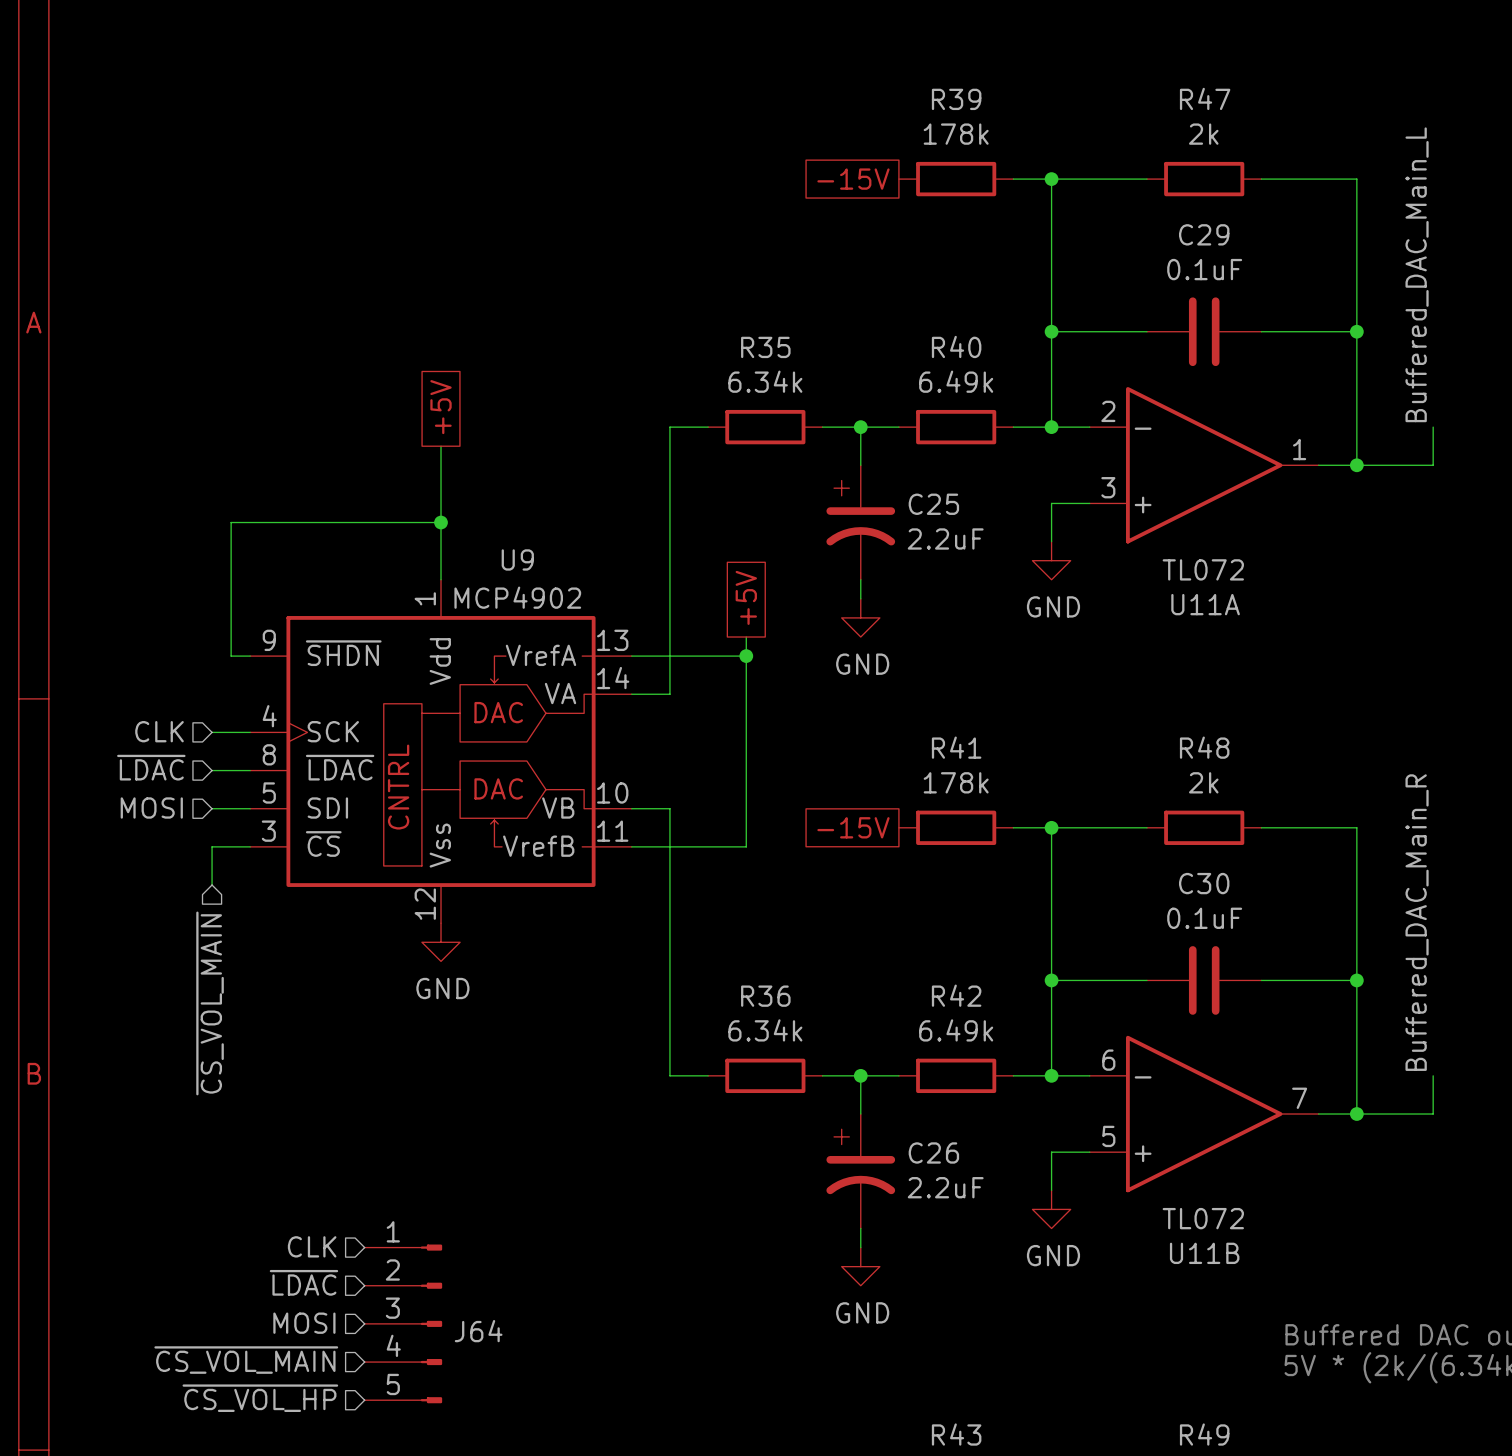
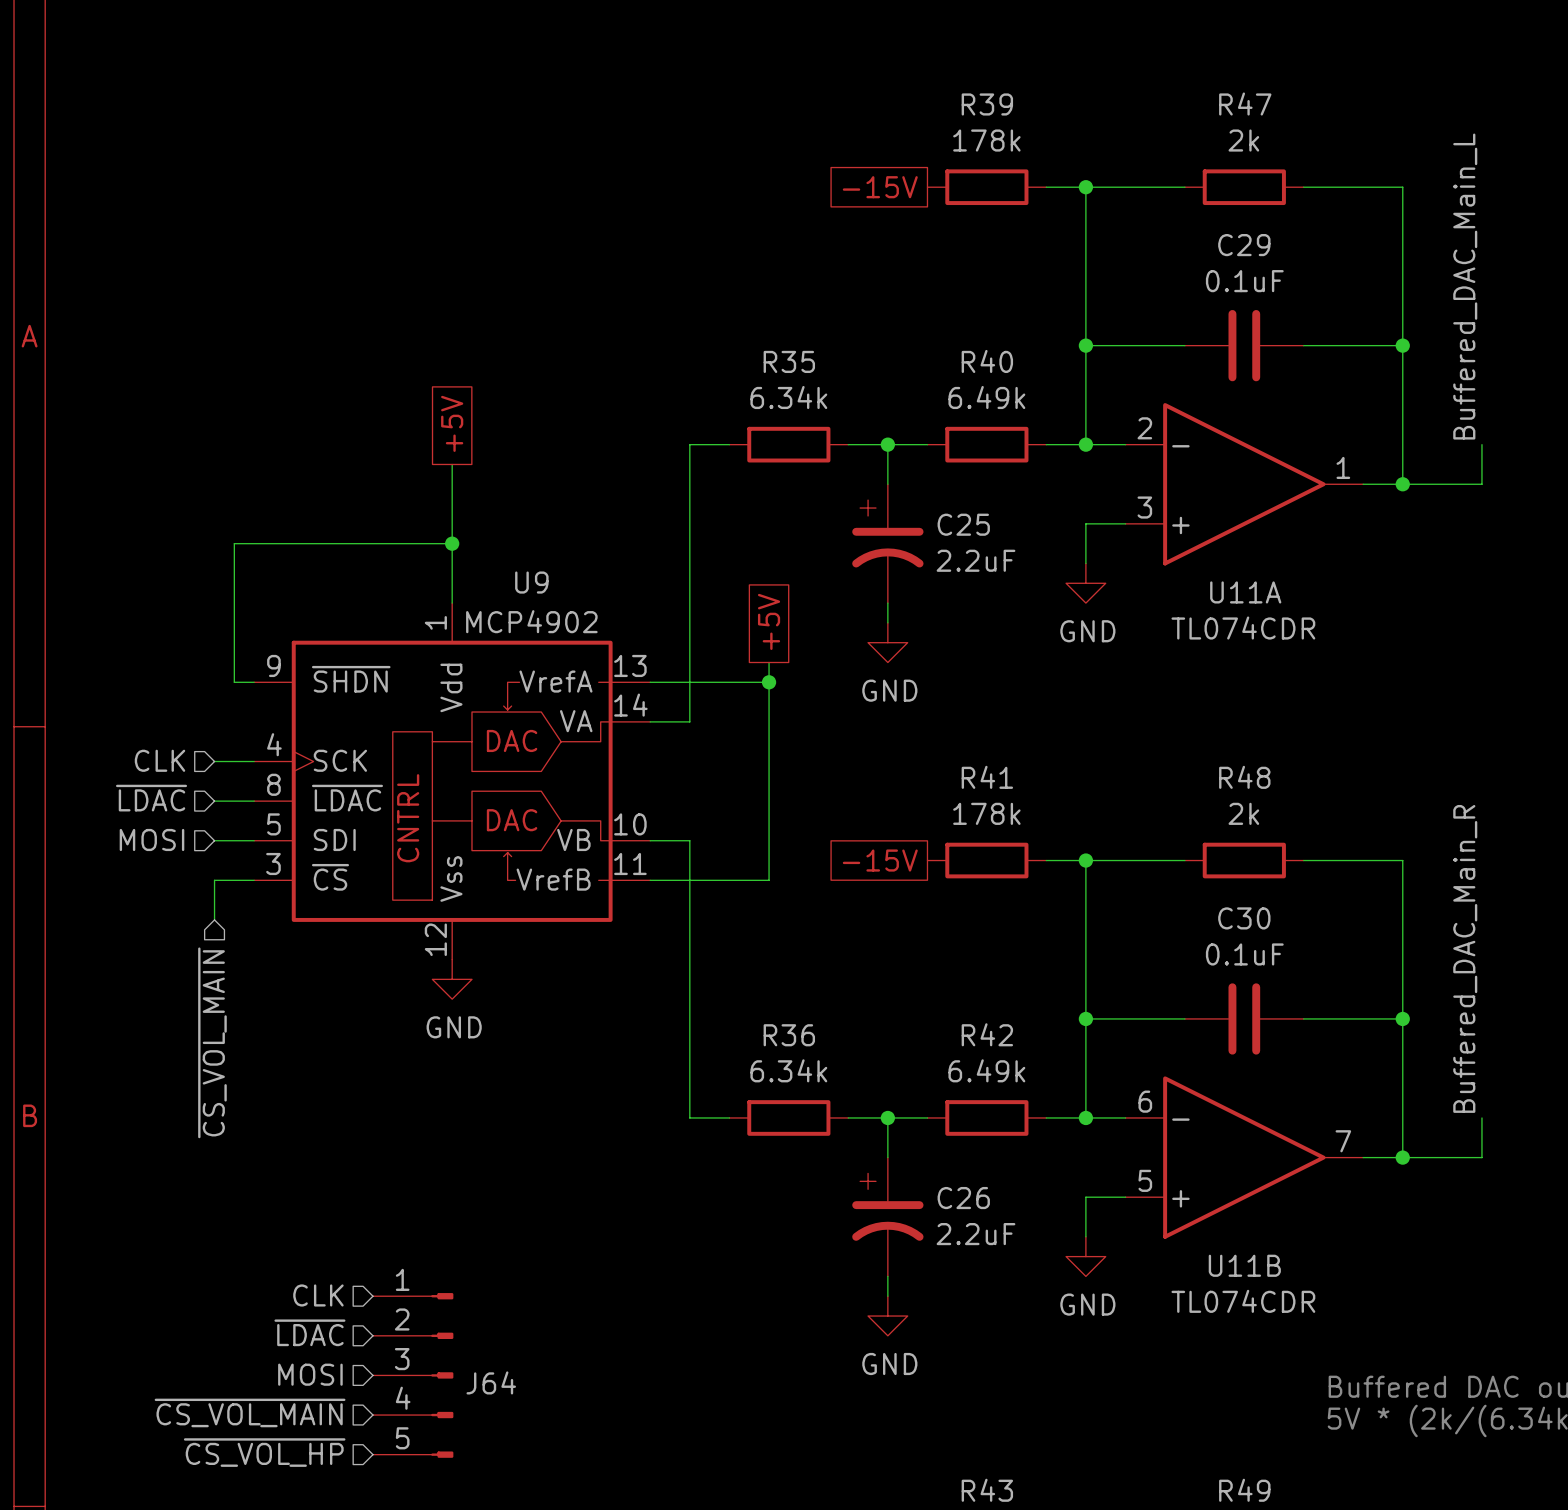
U11A value: TL072 (1203, 569) -> TL074CDR (1243, 628)
U11A name position: U11A (1205, 604) -> U11A (1245, 592)
U11B value: TL072 (1203, 1218) -> TL074CDR (1243, 1301)
U11B name position: U11B (1204, 1253) -> U11B (1244, 1265)

